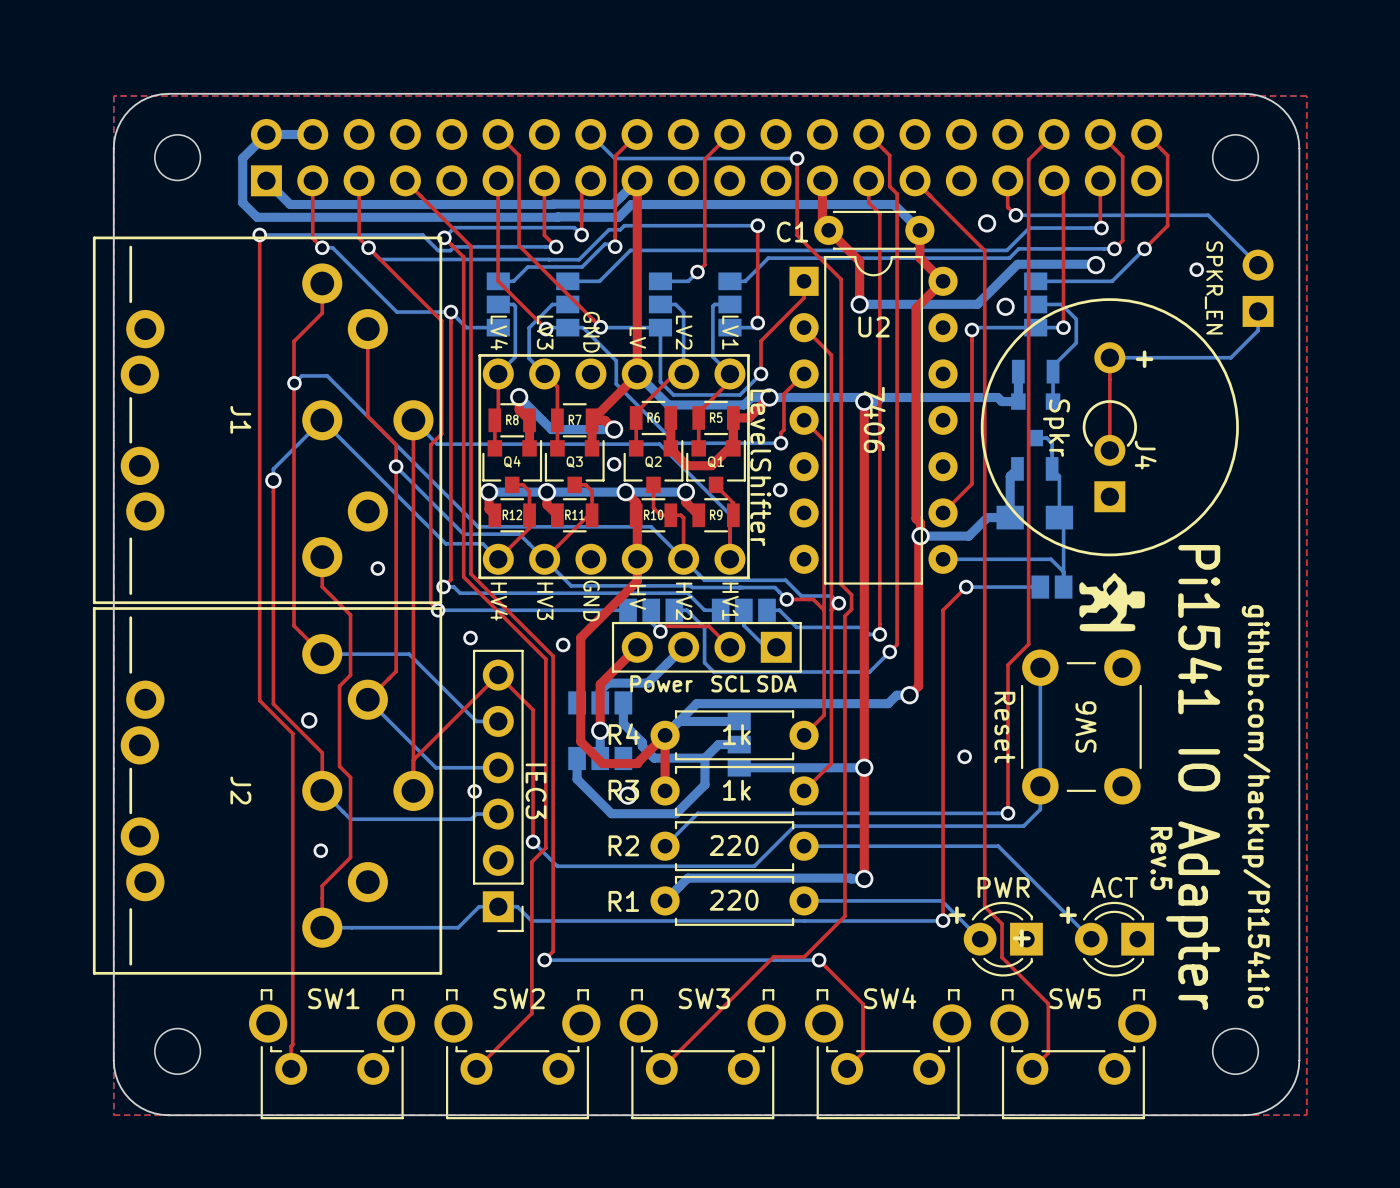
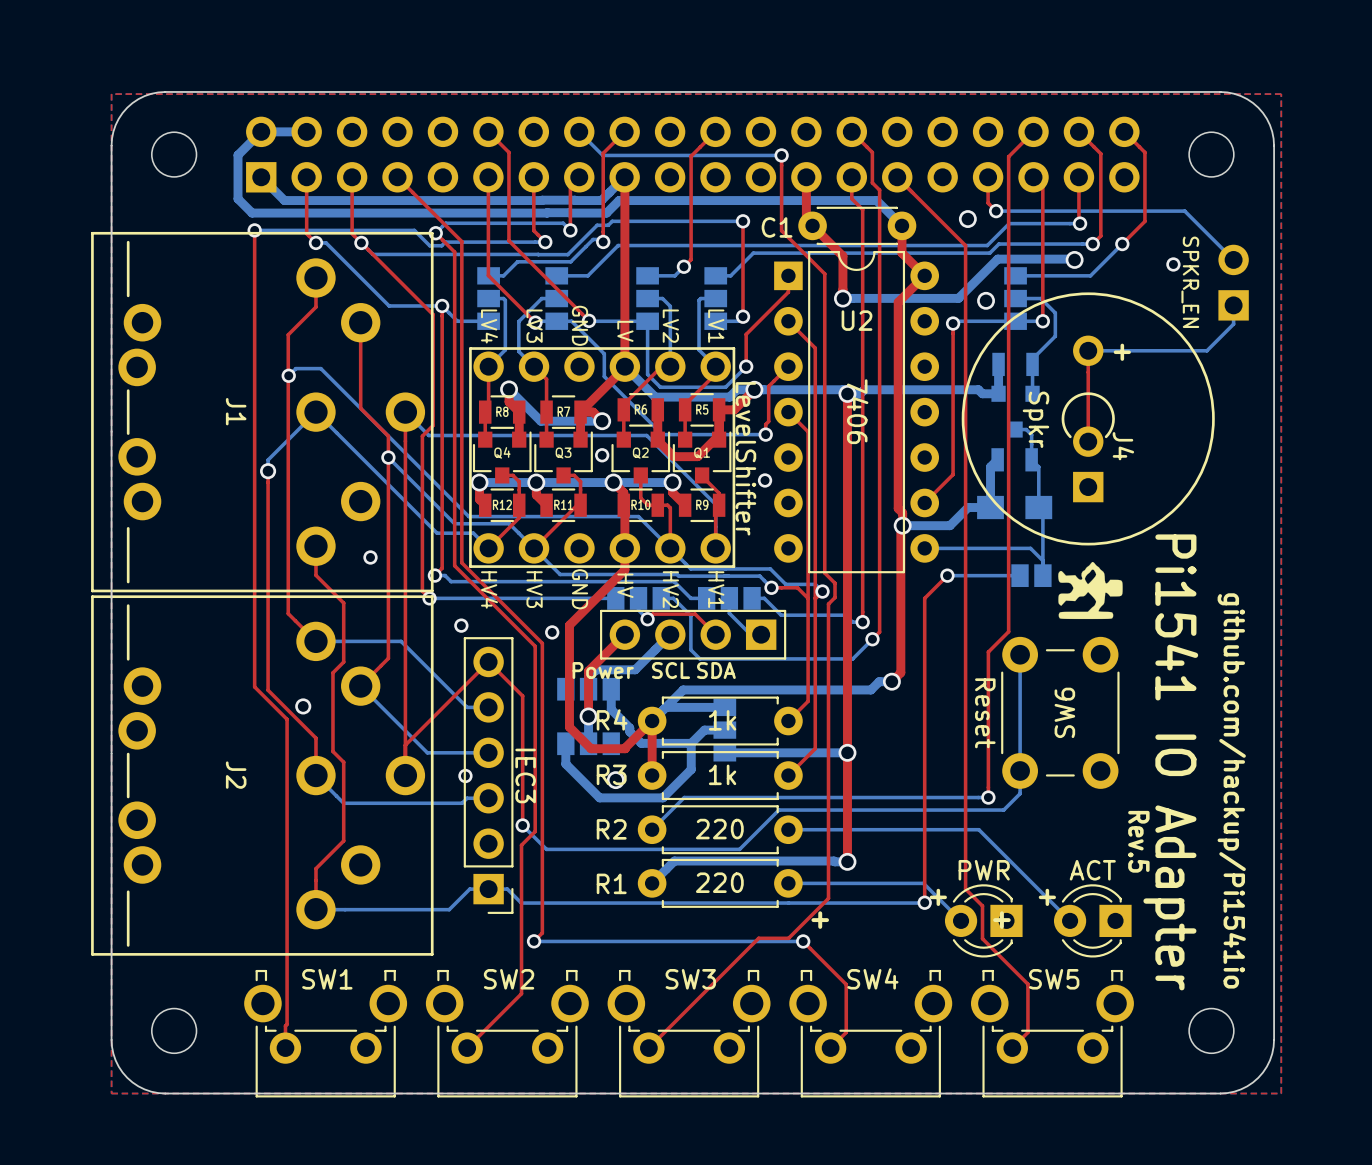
text position: Power (661, 683) -> Power (603, 670)
text: none -> SCL (671, 670)
text: SCL (730, 683) -> SDA (716, 670)
text: SDA (776, 683) -> none
via: (964, 756) -> none
via: (320, 850) -> none
text: none -> + (820, 920)

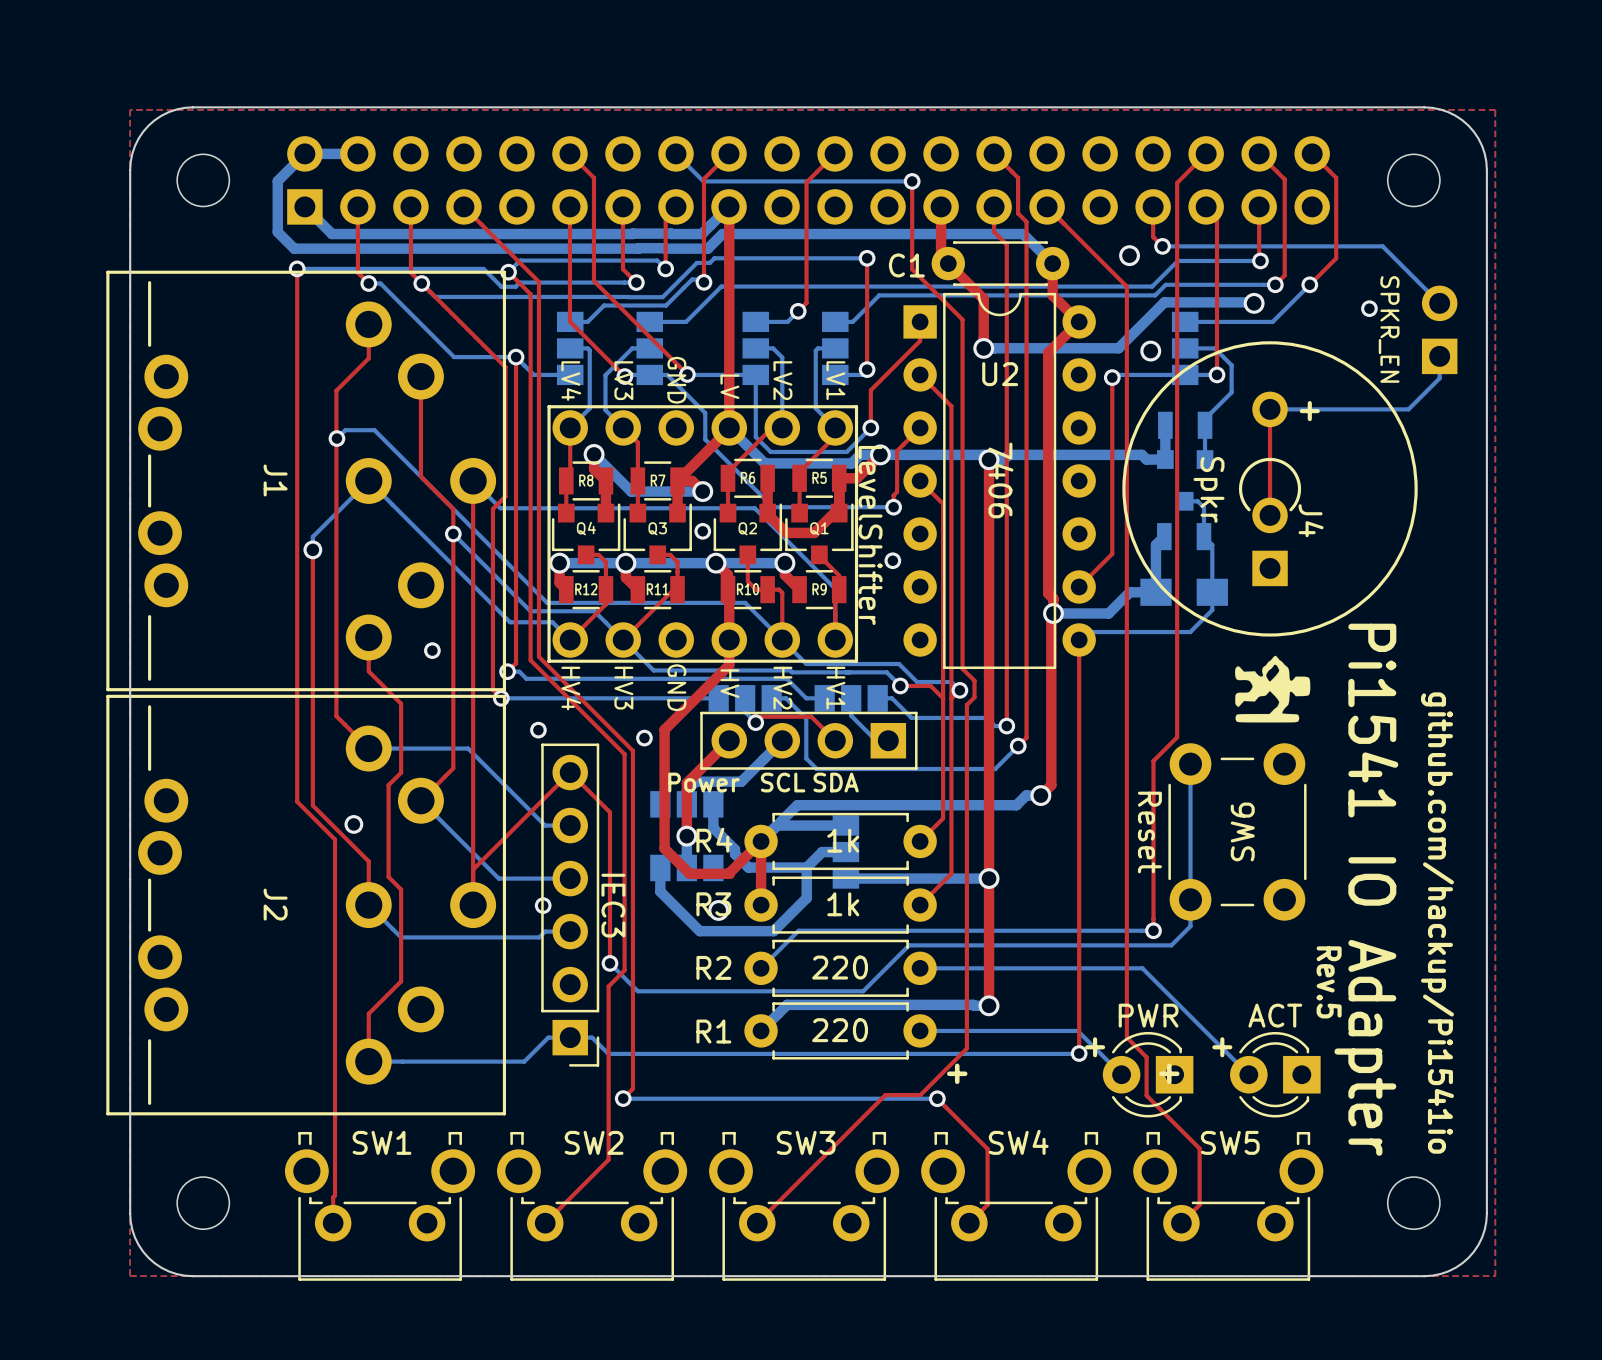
bottom track: (1038, 507) (1042, 511) (1042, 575) -> none
bottom track: (924, 548) (1030, 548) (1042, 560) -> (1079, 640) (1087, 632) (1190, 632) (1212, 610) (1212, 592)
top track: (947, 575) (924, 598) -> (1079, 640) (1079, 698)
bottom track: (947, 575) (1020, 575) -> none
via: (947, 575) -> none
part: (1031, 575) -> none

